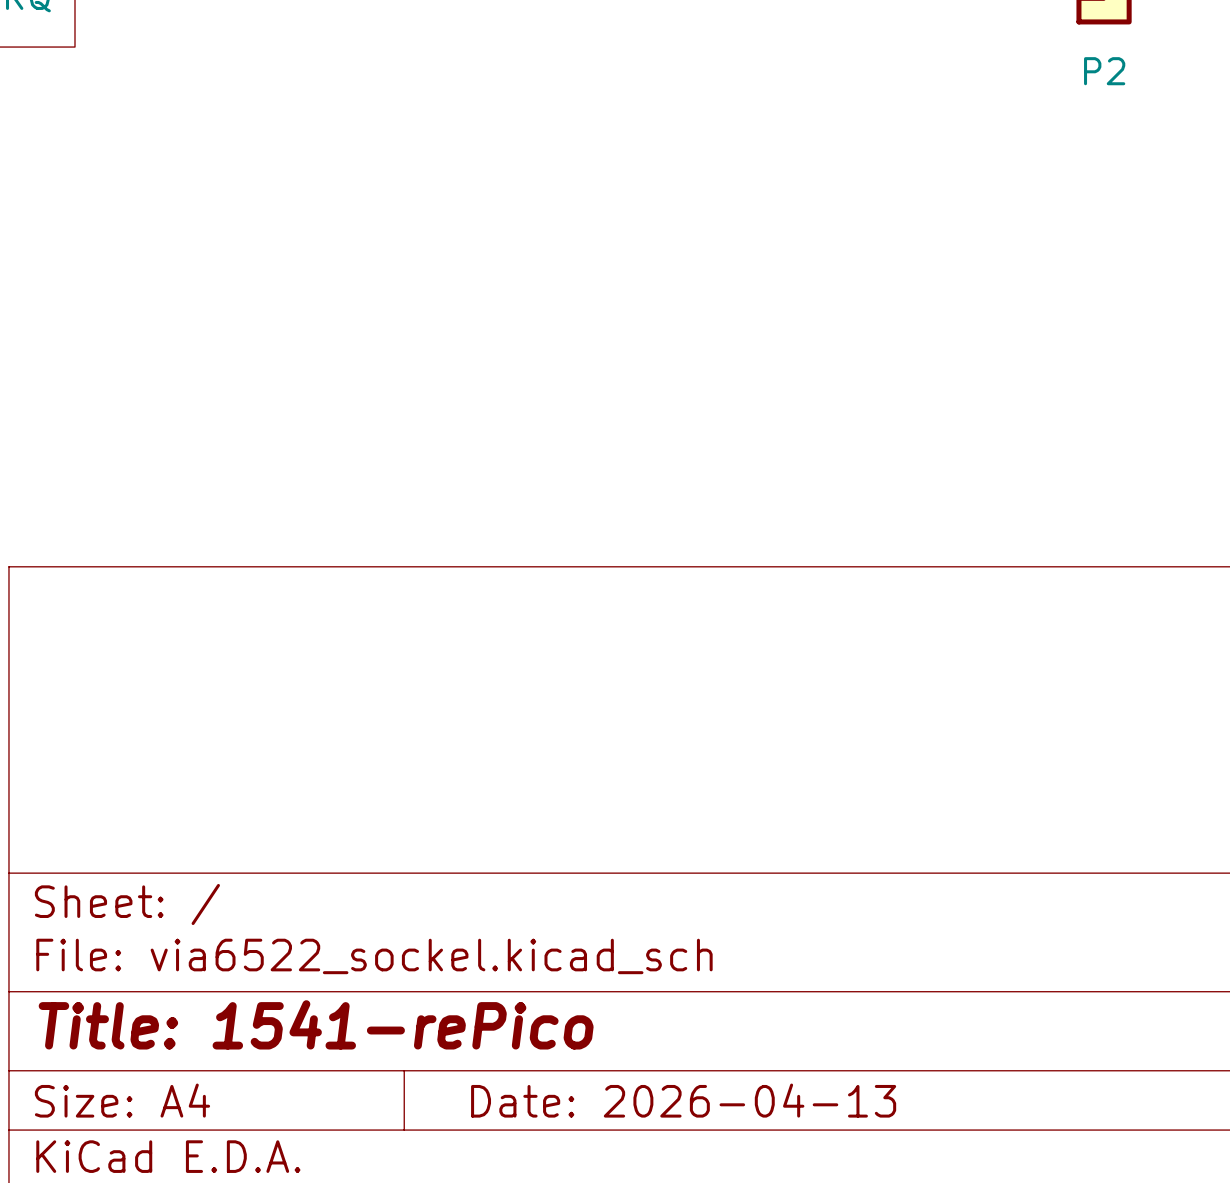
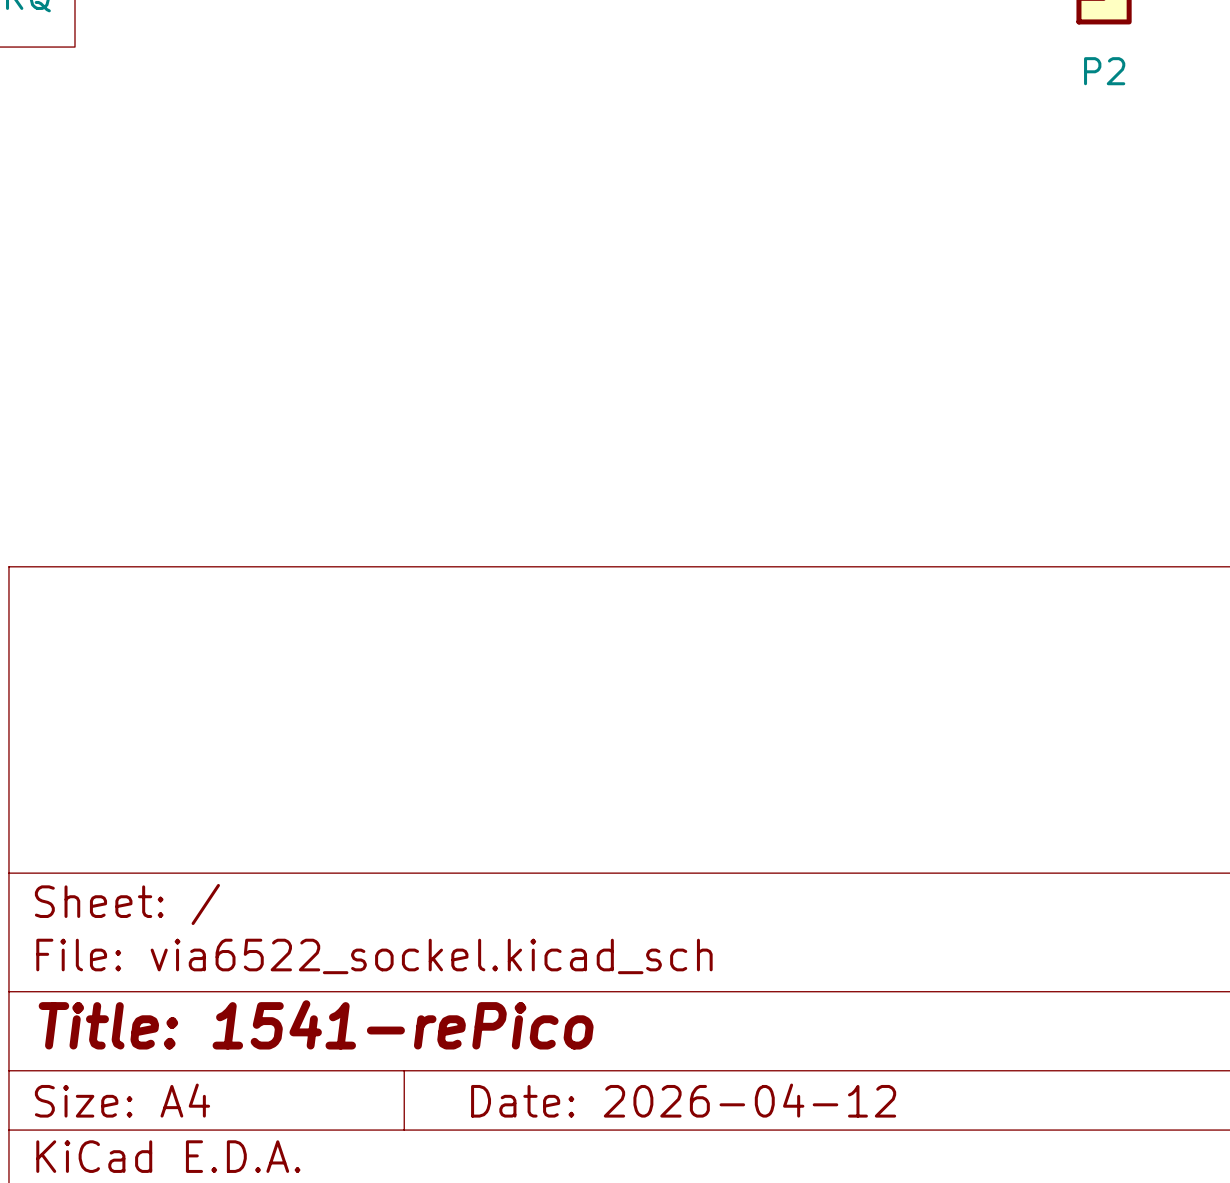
title block: Date: 2026-04-13 (683, 1100) -> Date: 2026-04-12 (683, 1100)

